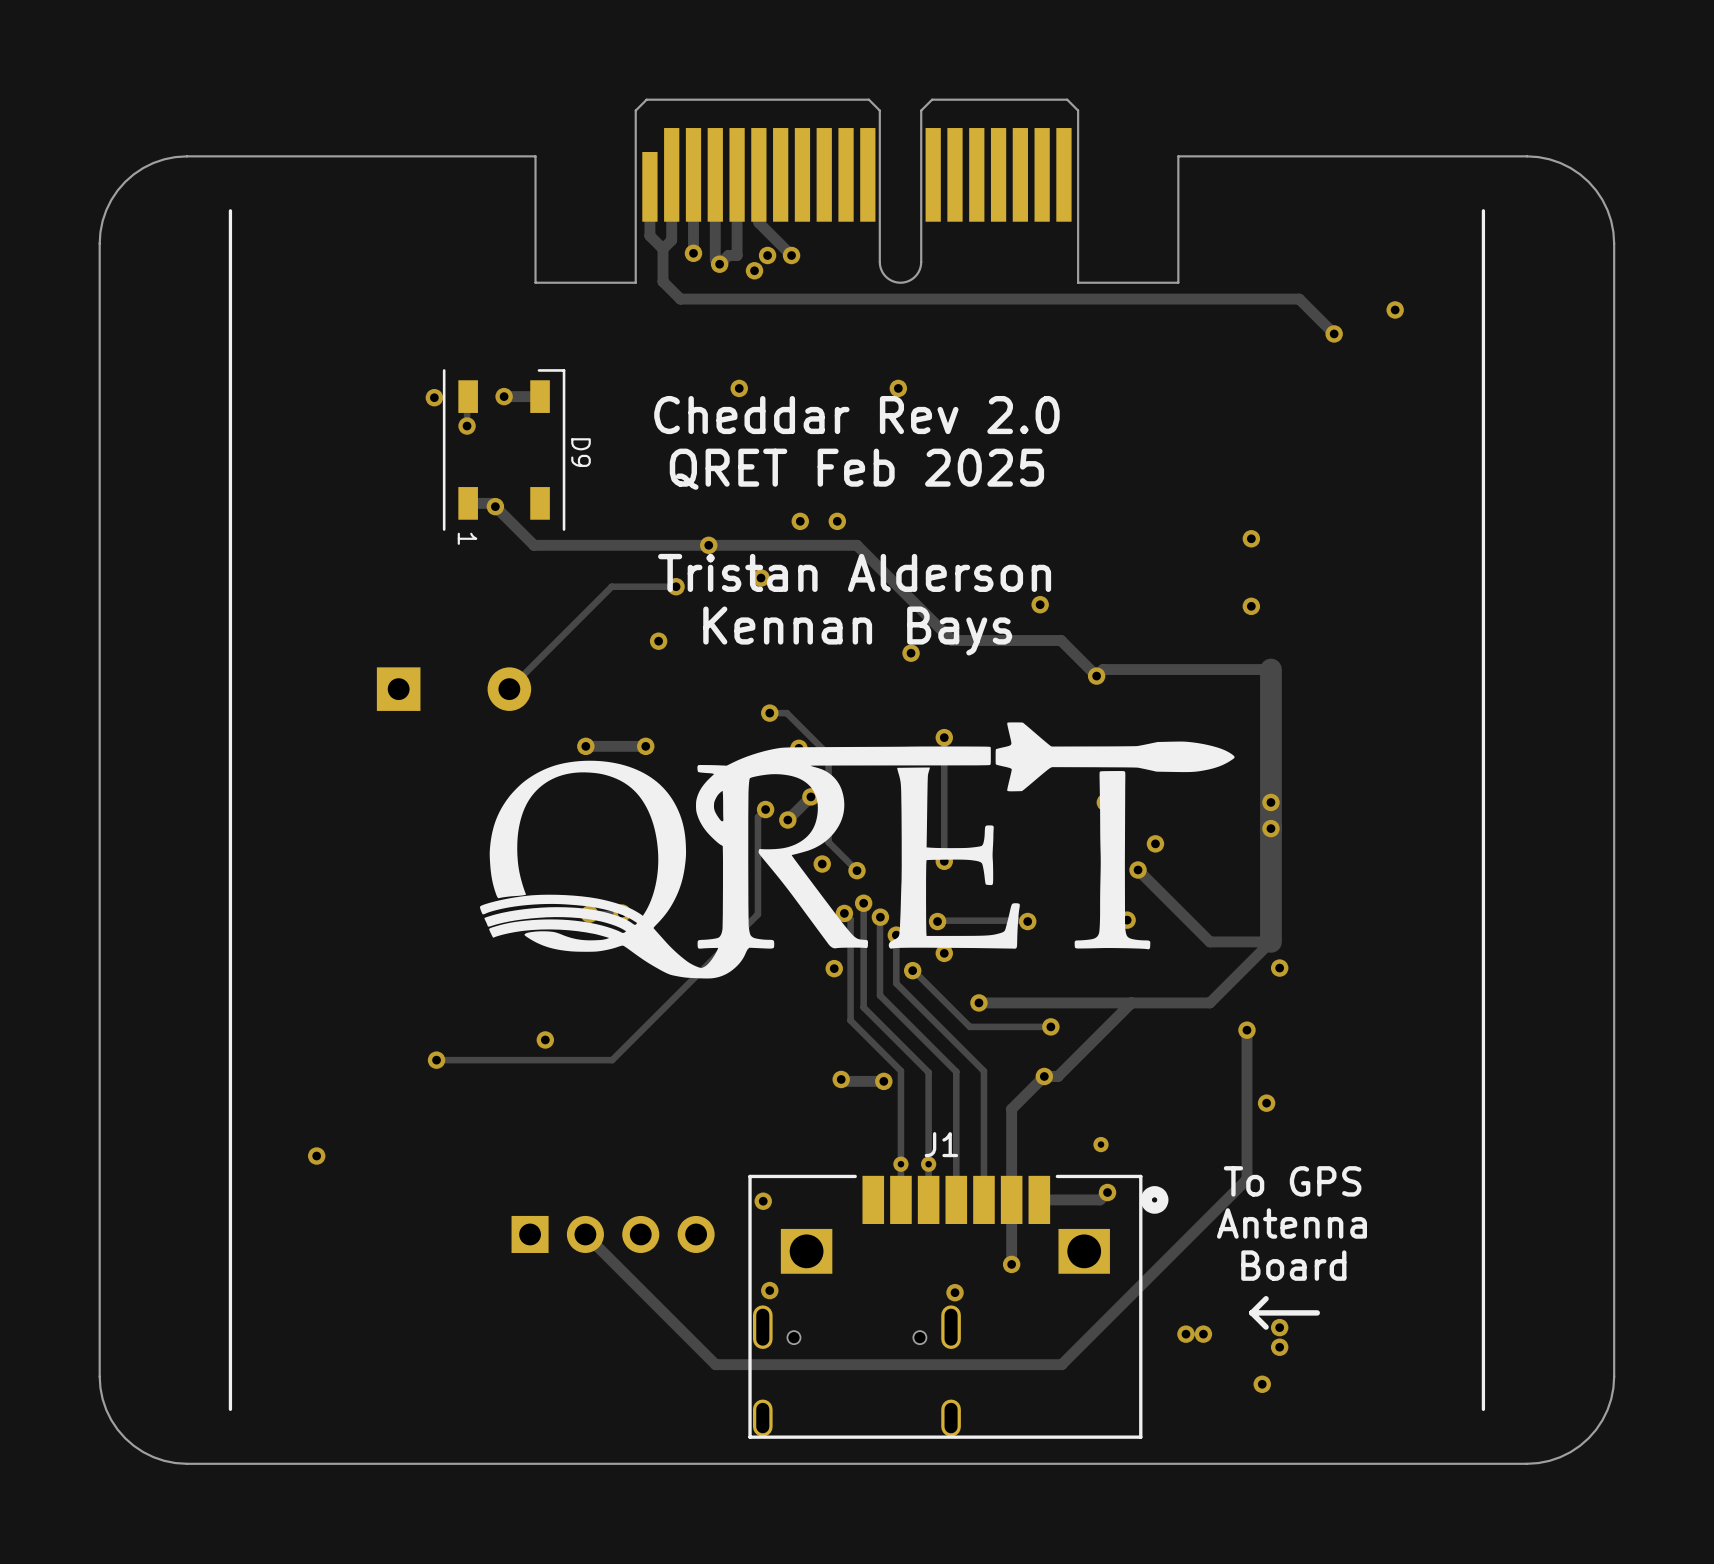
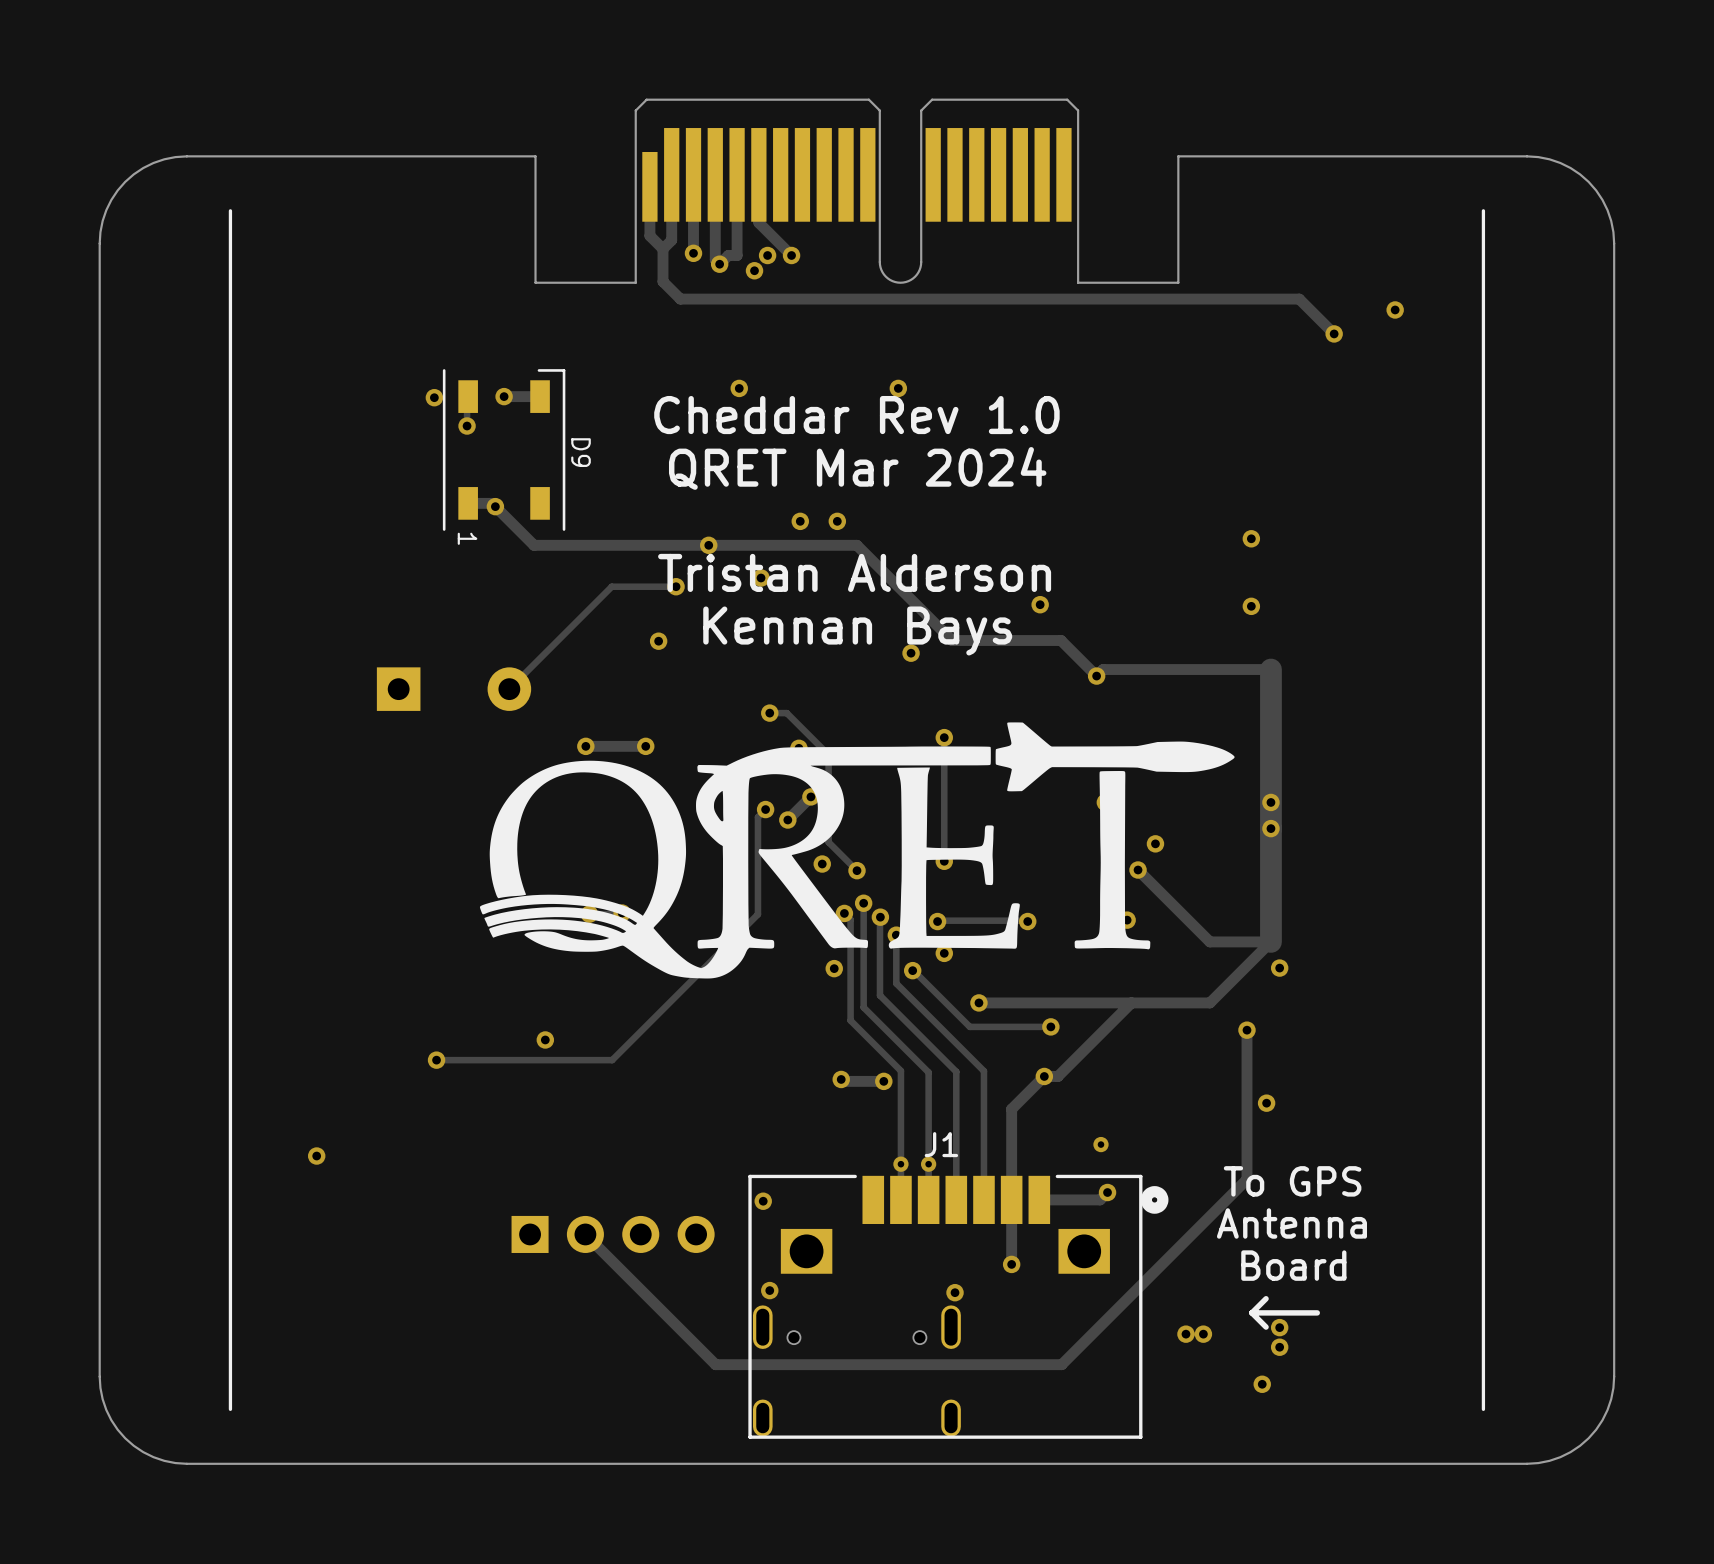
text: Cheddar Rev 2.0 (856, 415) -> Cheddar Rev 1.0 (856, 415)
text: QRET Feb 2025 (856, 469) -> QRET Mar 2024 (857, 468)

